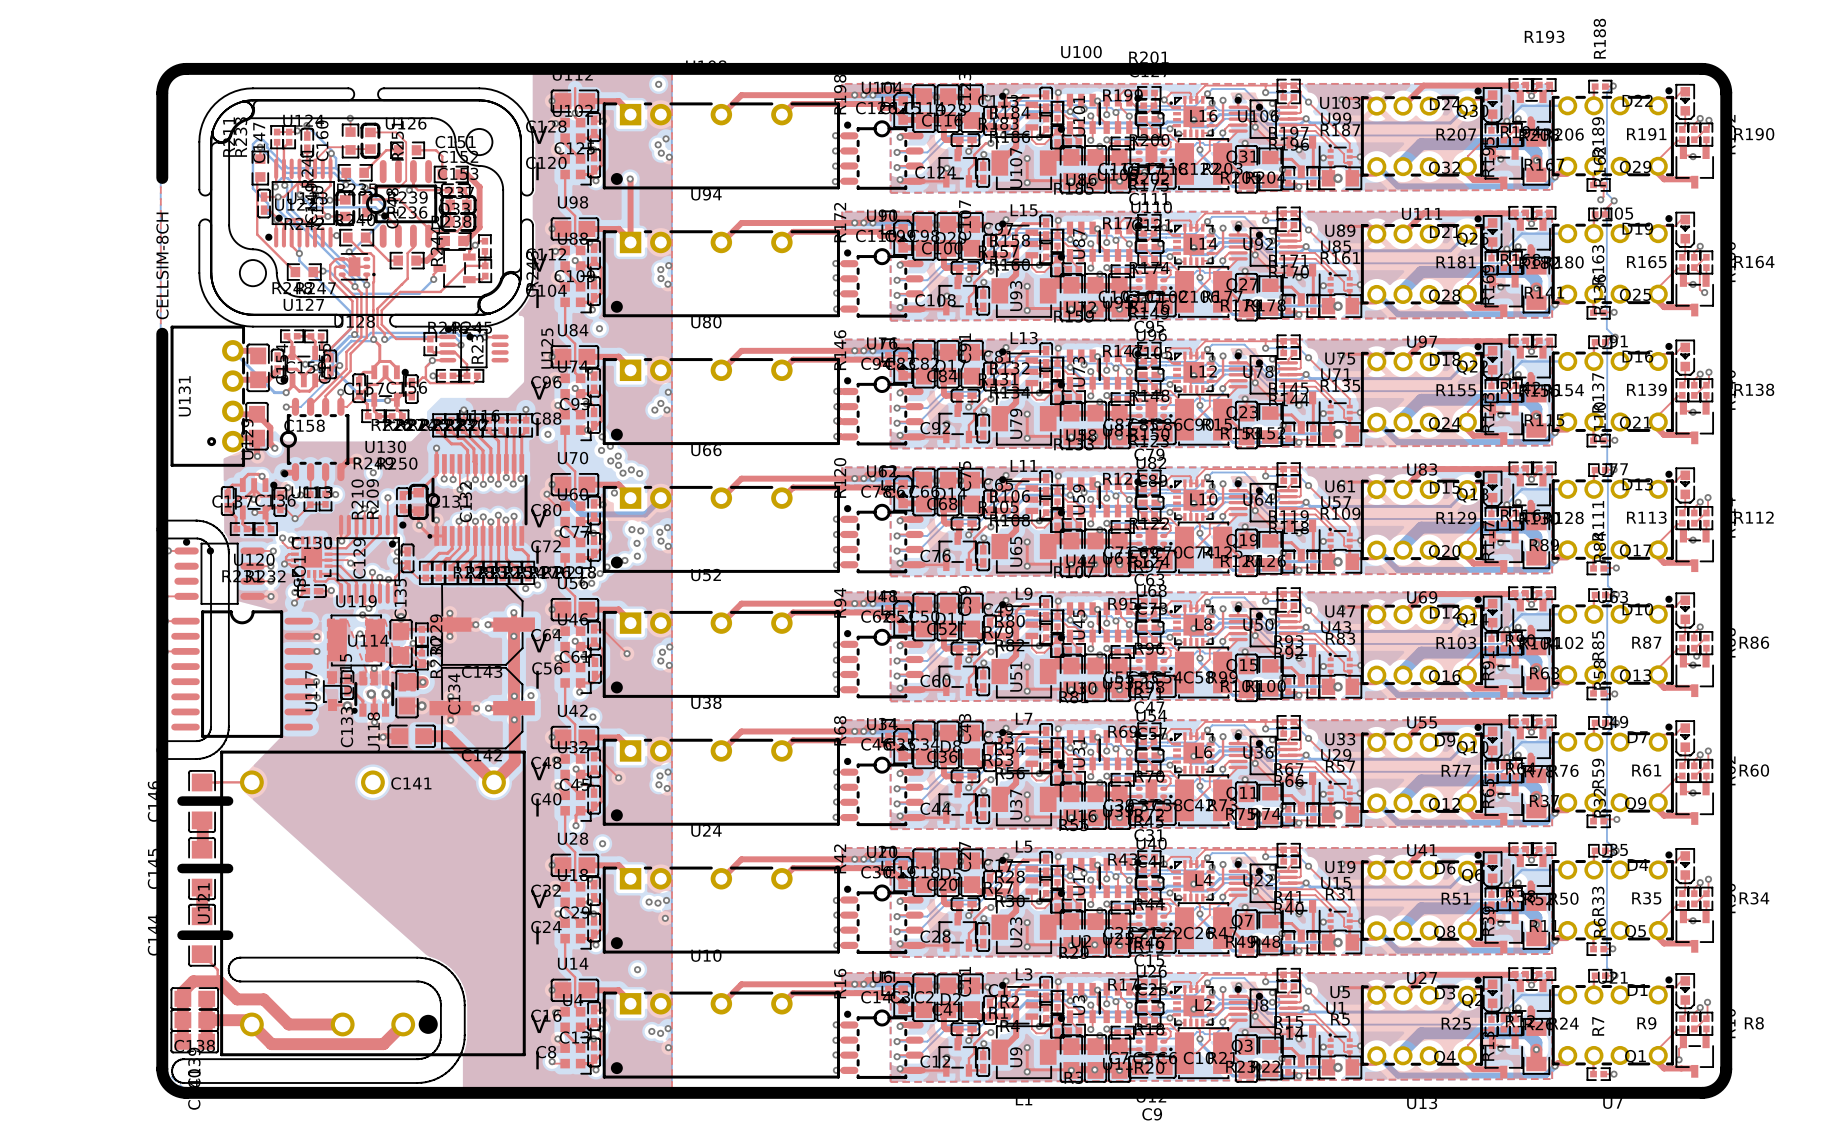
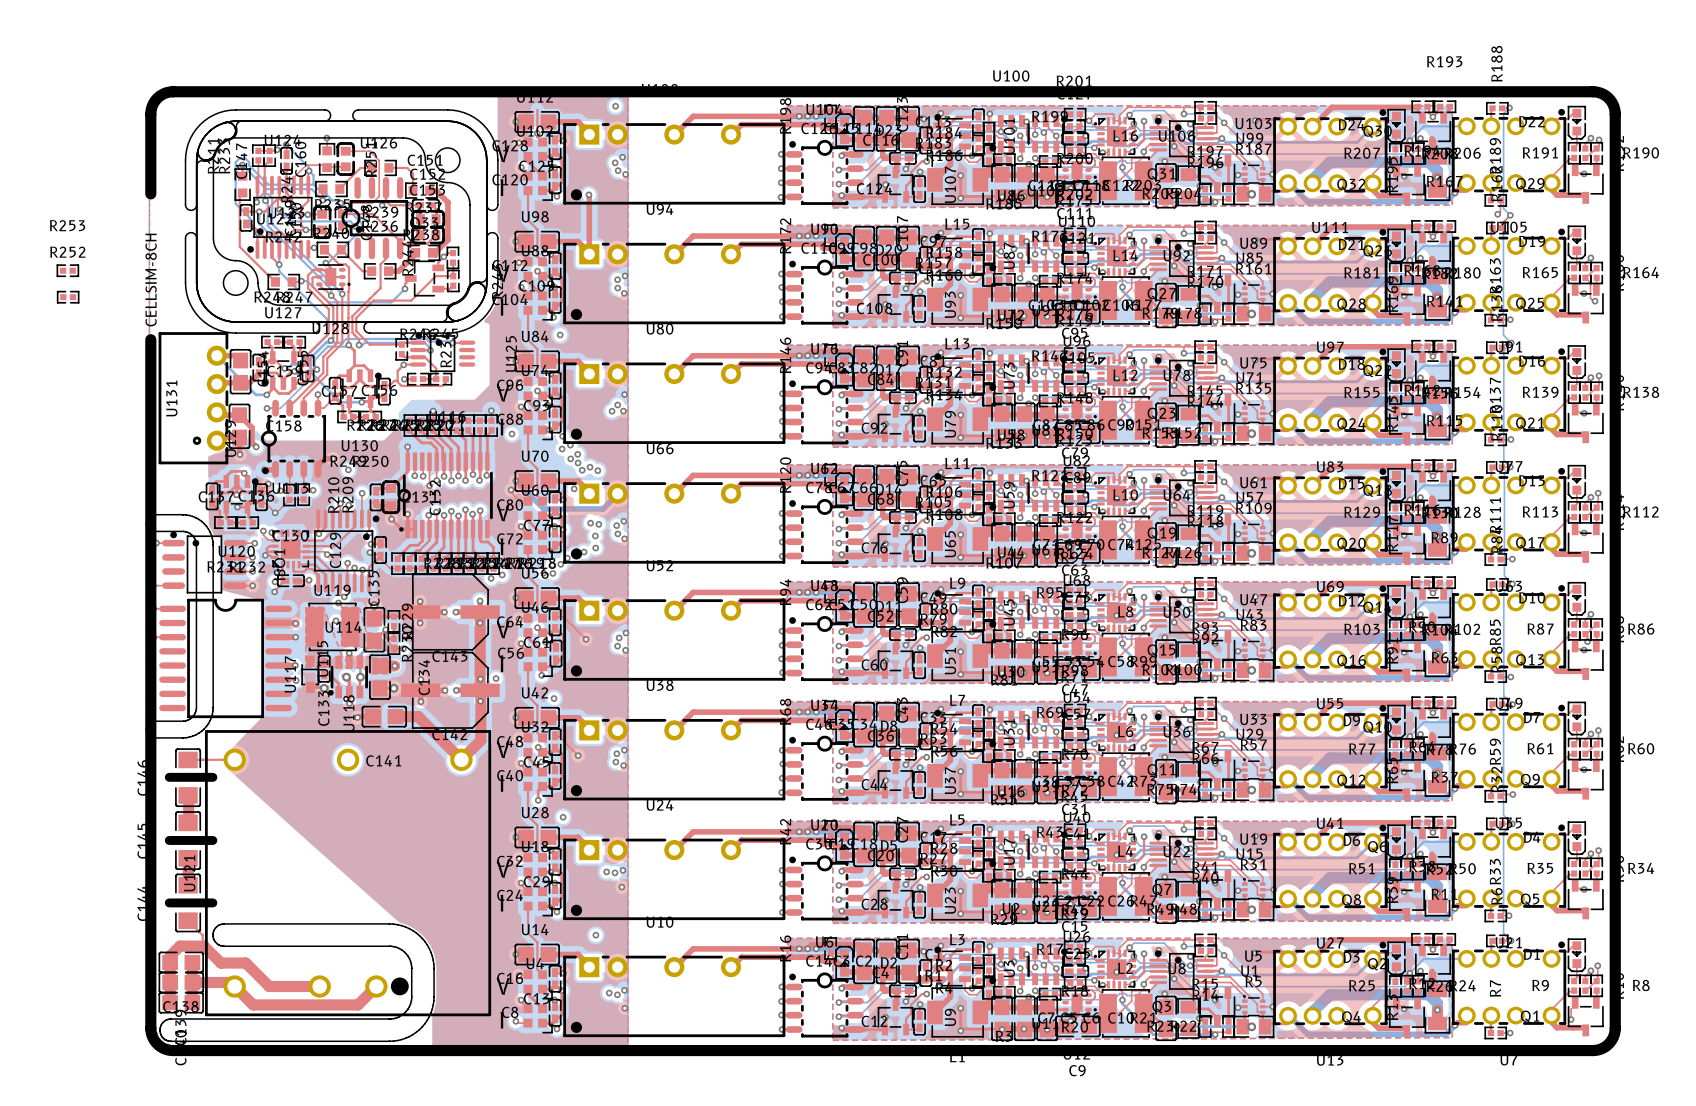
R253: none -> (67, 270)
R252: none -> (68, 297)

